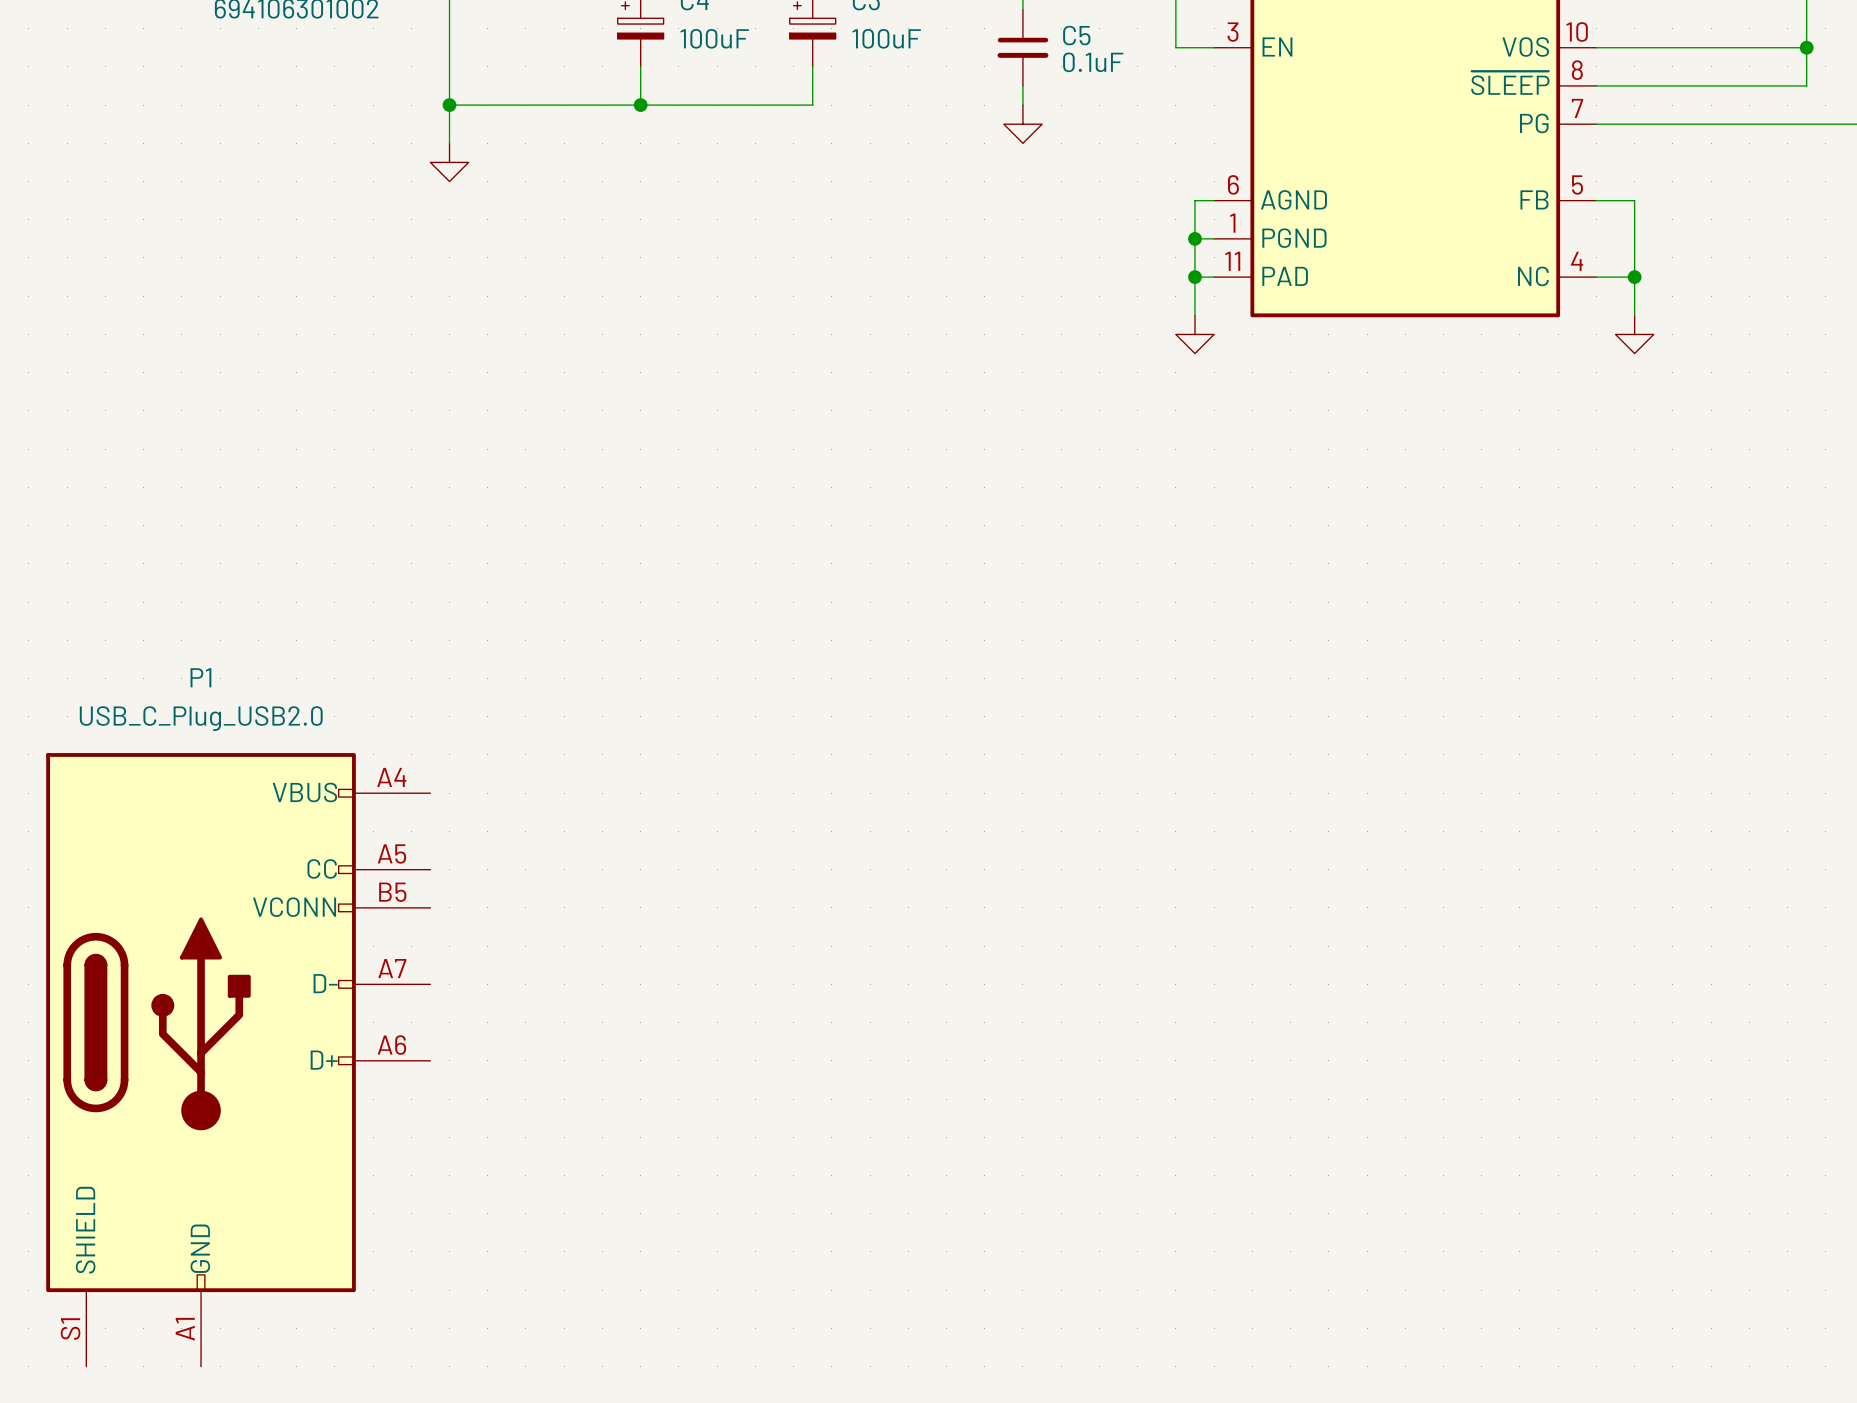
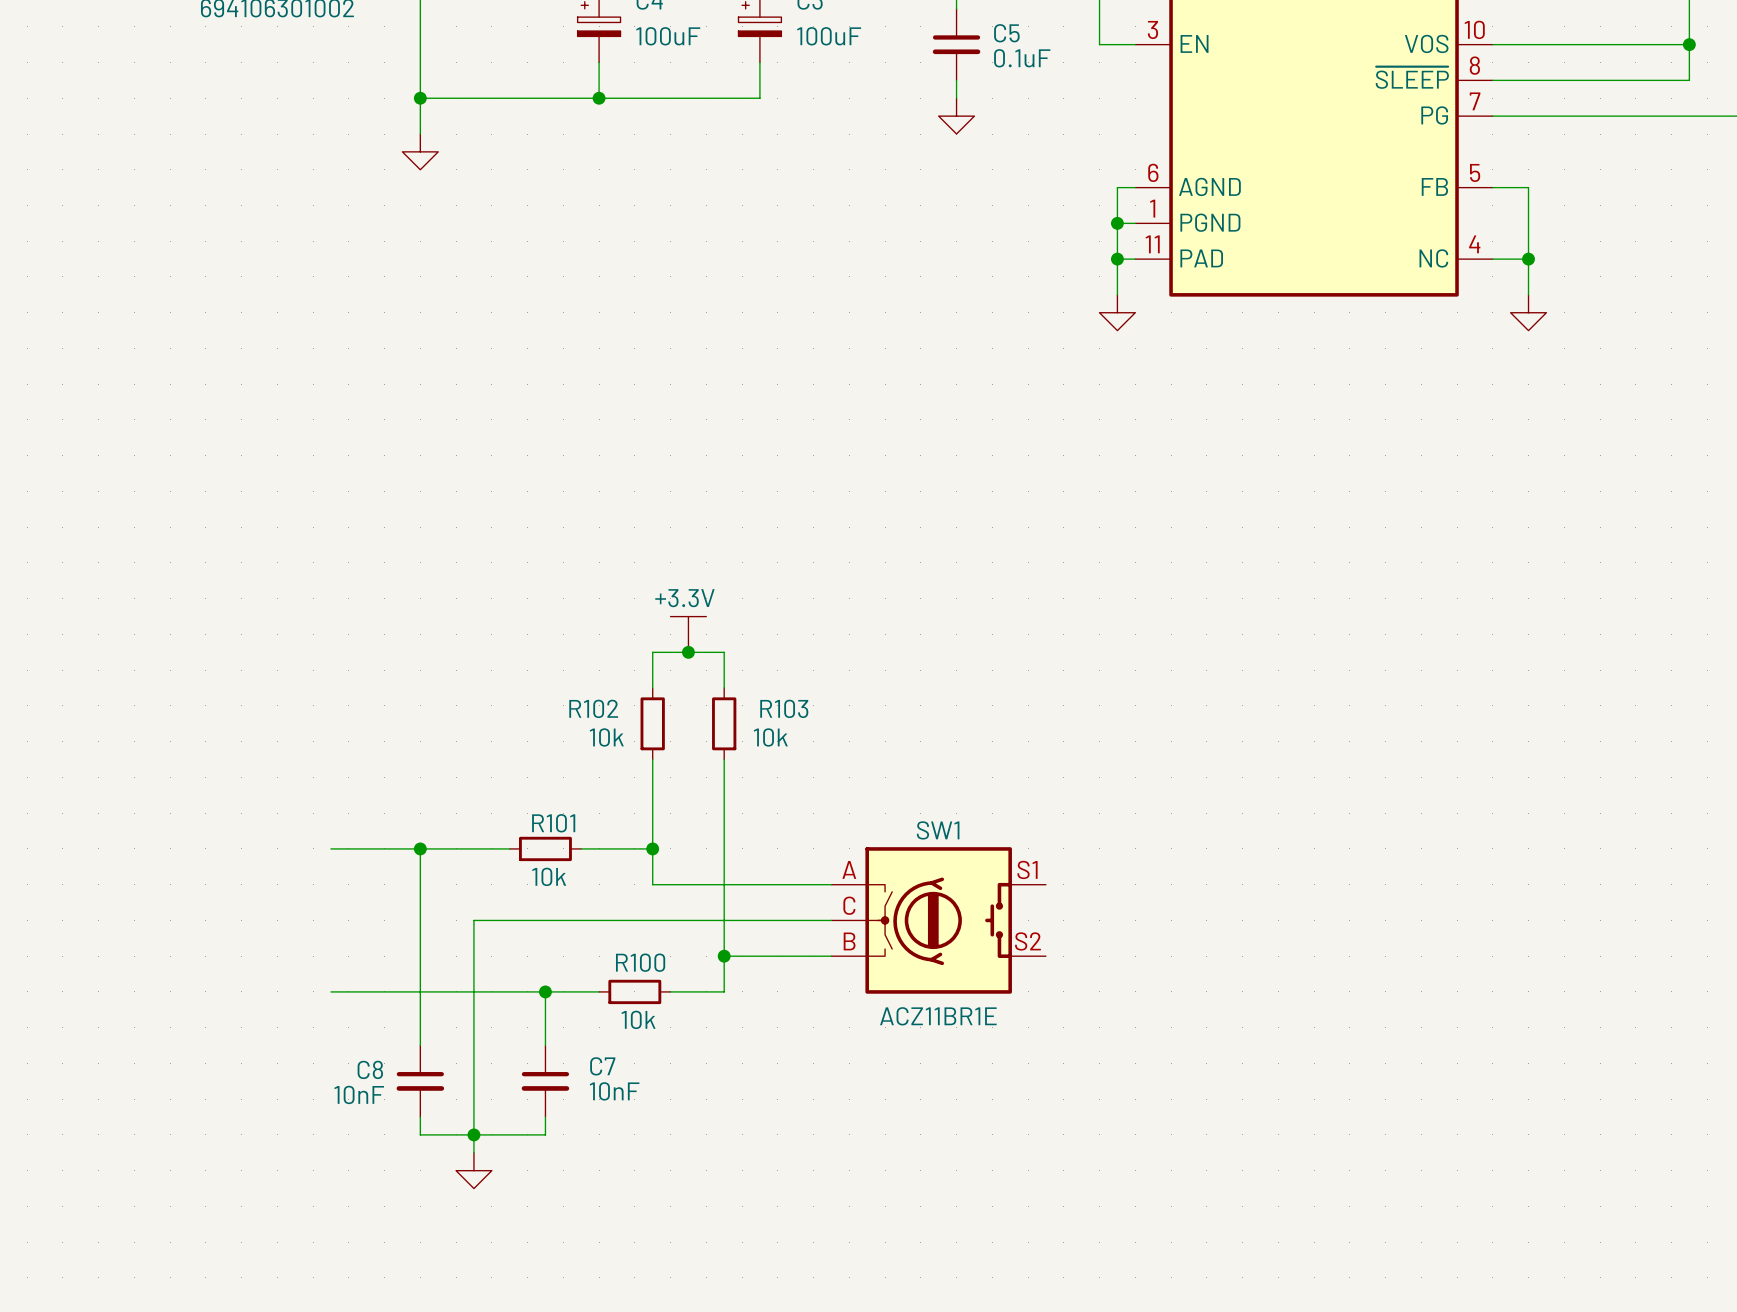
power symbol: none -> +3.3V (688, 634)
junction: none -> (688, 652)
wire: none -> (652, 688) (652, 652) (724, 652) (724, 688)
R102: none -> 10k (652, 723)
R103: none -> 10k (724, 723)
wire: none -> (652, 759) (652, 884) (831, 884)
wire: none -> (724, 759) (724, 991) (670, 991)
wire: none -> (330, 848) (509, 848)
wire: none -> (420, 848) (420, 1045)
junction: none -> (420, 848)
R101: none -> 10k (545, 848)
wire: none -> (581, 848) (652, 848)
junction: none -> (652, 848)
wire: none -> (831, 920) (473, 920) (473, 1152)
SW1: none -> ACZ11BR1E (938, 920)
wire: none -> (724, 956) (831, 956)
junction: none -> (724, 956)
P1: USB_C_Plug_USB2.0 (238, 1059) -> none
wire: none -> (330, 991) (599, 991)
wire: none -> (545, 991) (545, 1045)
junction: none -> (545, 991)
R100: none -> 10k (634, 991)
C8: none -> 10nF (420, 1081)
C7: none -> 10nF (545, 1081)
wire: none -> (420, 1117) (420, 1134) (545, 1134) (545, 1117)
junction: none -> (473, 1134)
power symbol: none -> (473, 1170)

